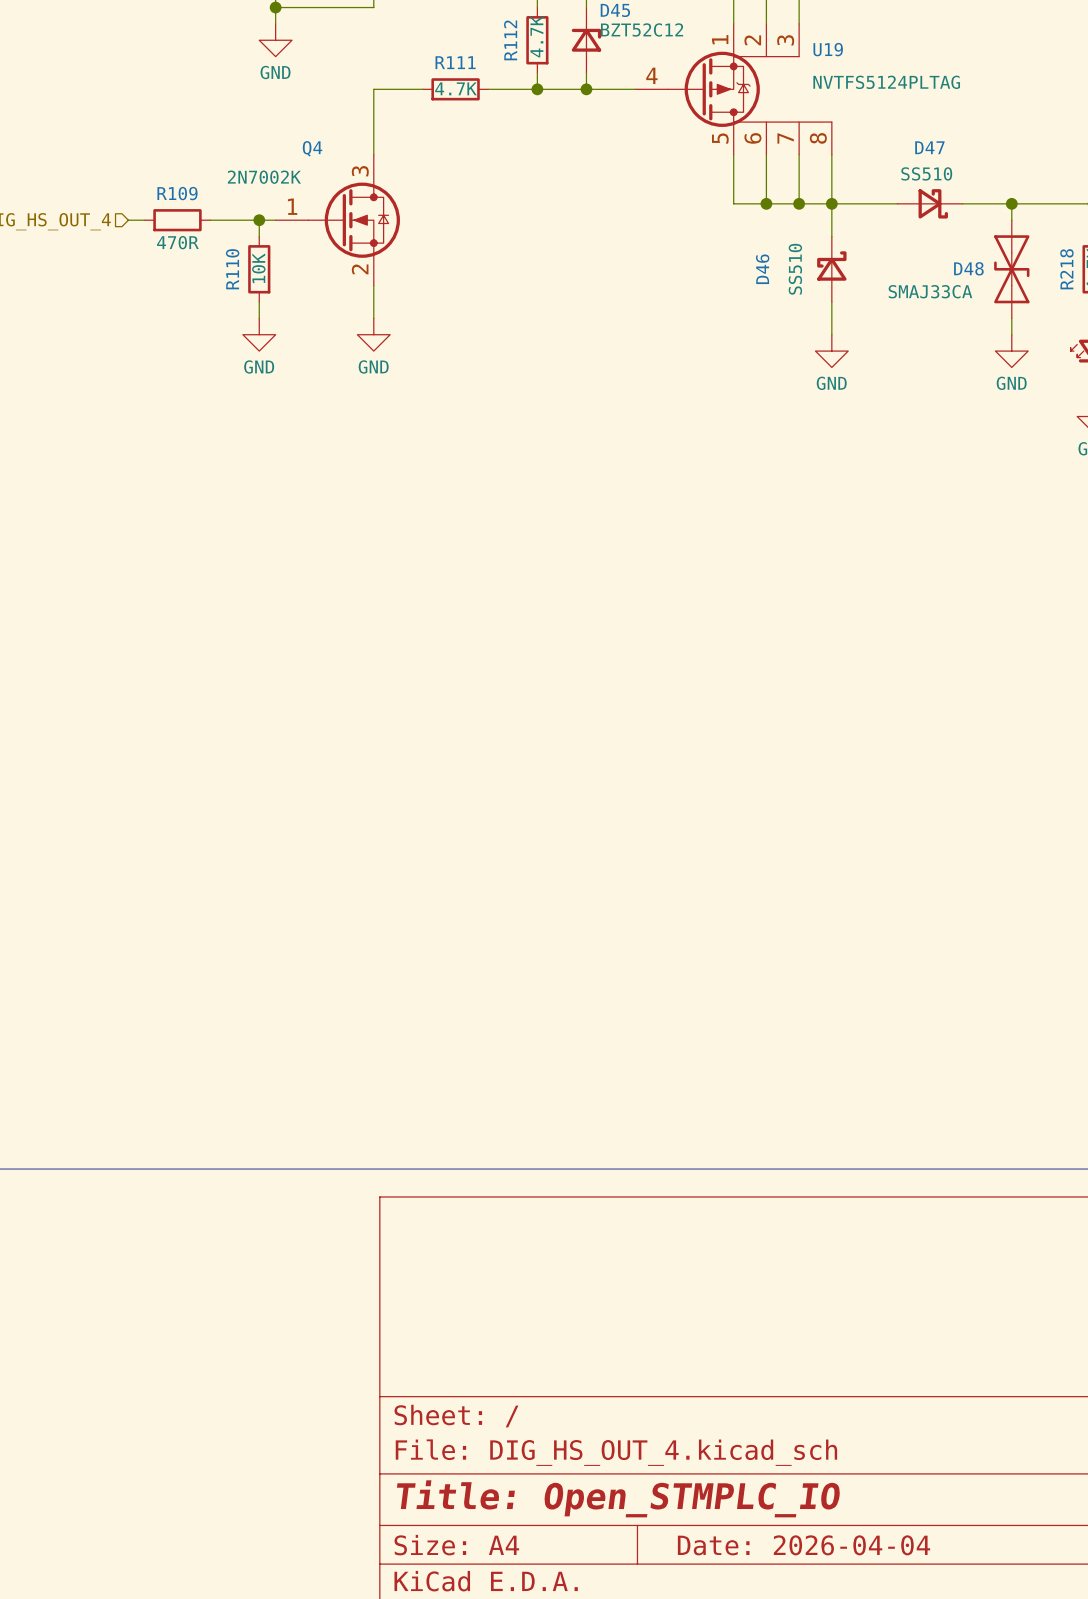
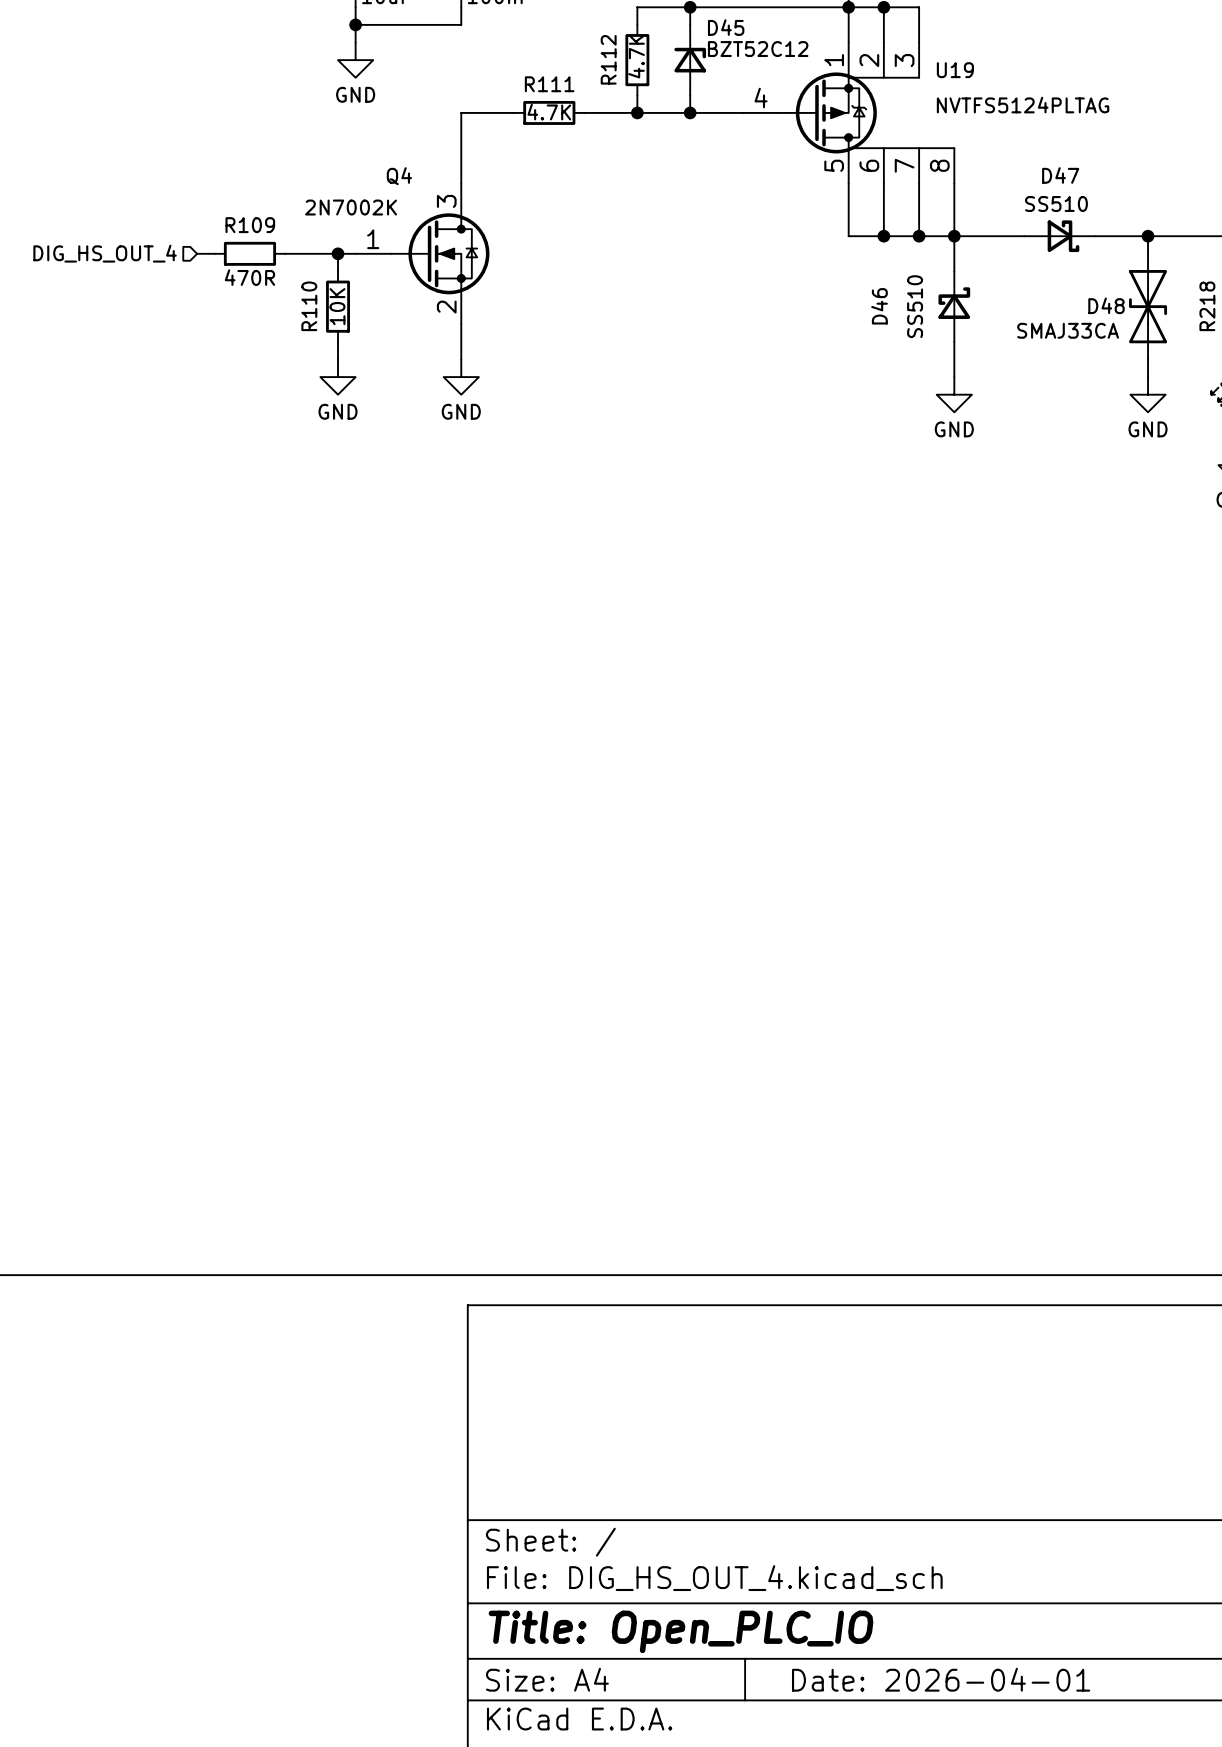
title block: Title: Open_STMPLC_IO (618, 1498) -> Title: Open_PLC_IO (680, 1631)
title block: Date: 2026-04-04 (804, 1545) -> Date: 2026-04-01 (941, 1679)

